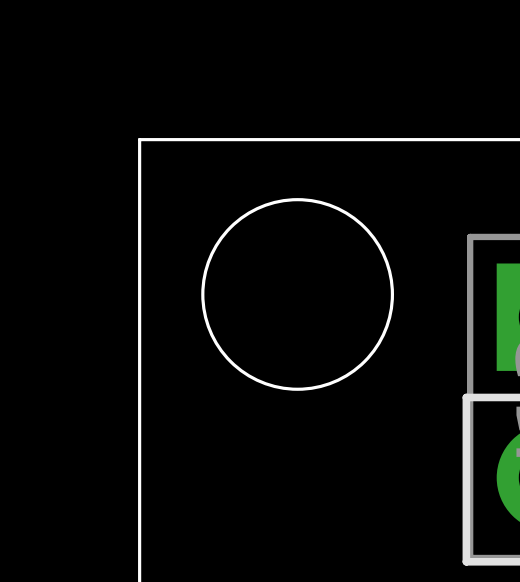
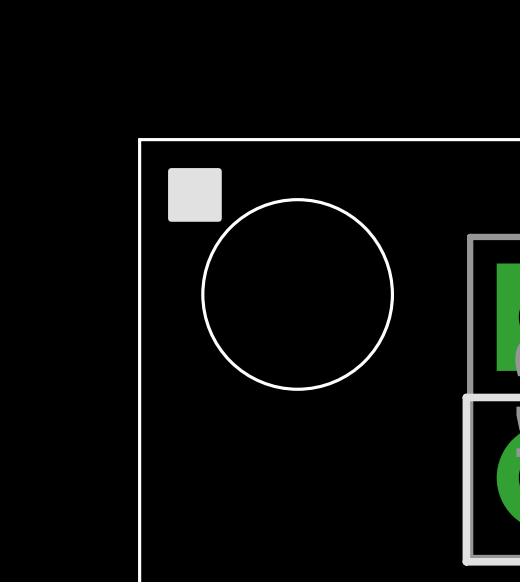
drawing: none -> [168, 168, 222, 222]

